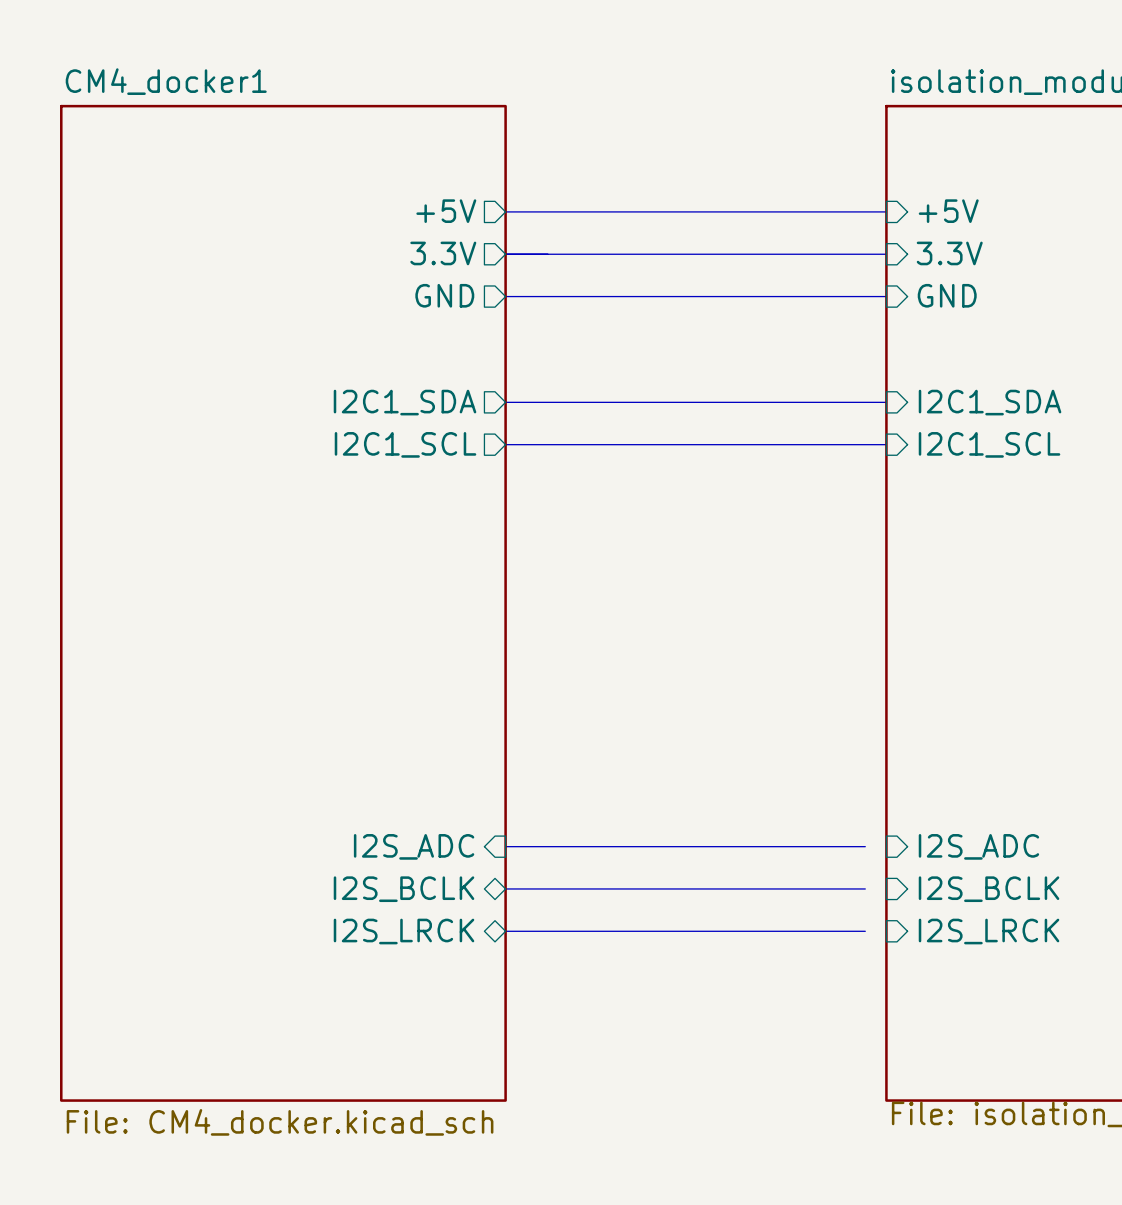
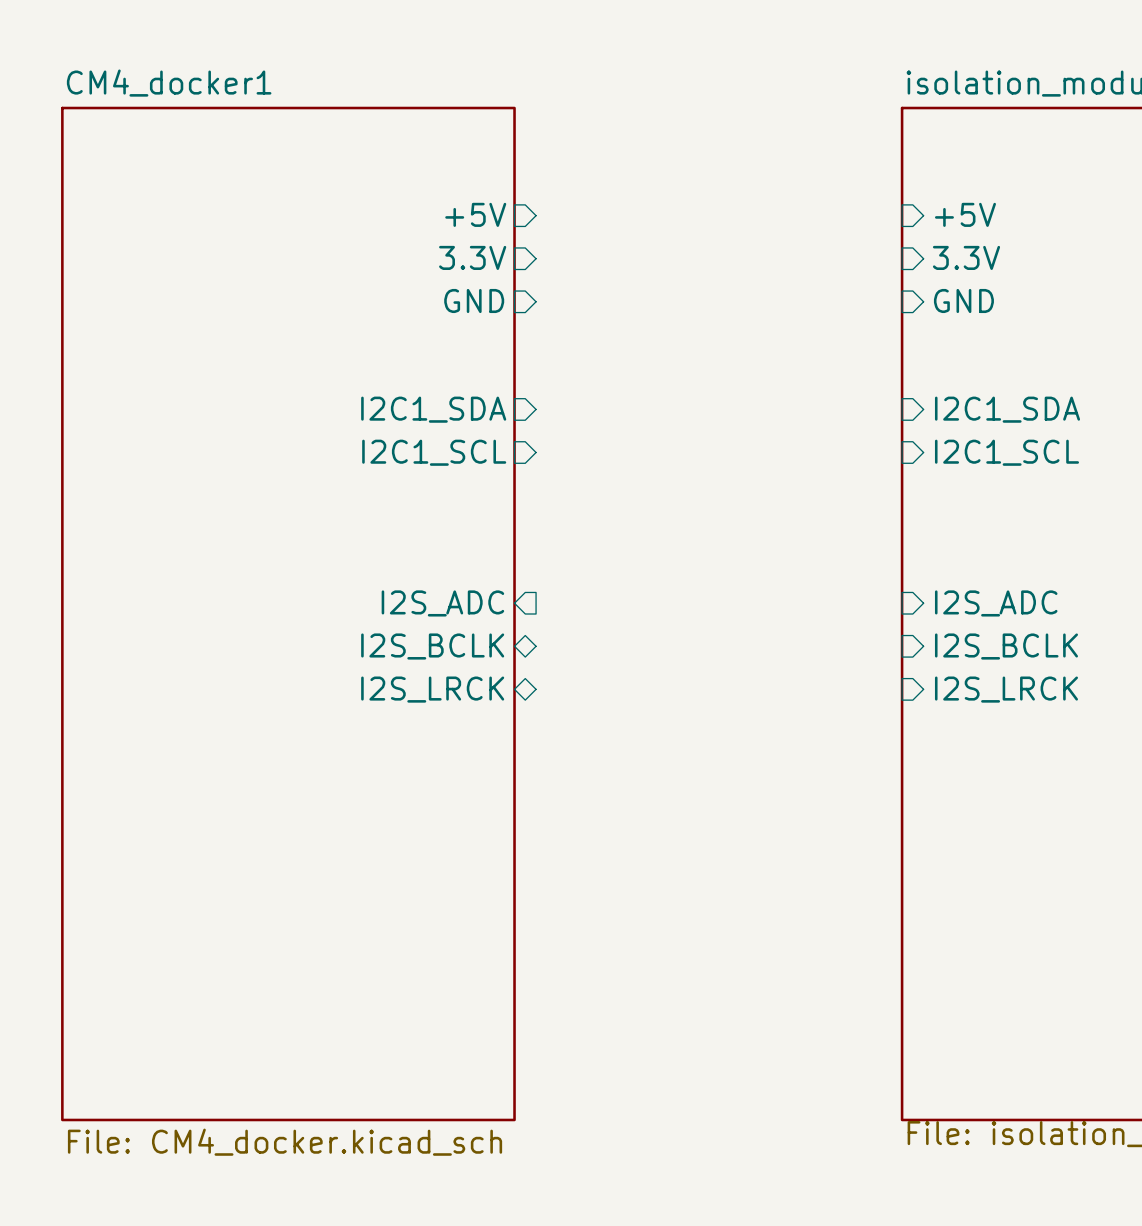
sheet pin position: +5V (446, 211) -> +5V (475, 214)
line: (505, 211) (886, 211) -> none
sheet pin position: 3.3V (443, 253) -> 3.3V (472, 257)
line: (505, 254) (886, 254) -> none
sheet pin position: GND (444, 295) -> GND (474, 300)
line: (505, 296) (886, 296) -> none
sheet pin position: I2C1_SDA (405, 402) -> I2C1_SDA (433, 409)
line: (505, 402) (886, 402) -> none
sheet pin position: I2C1_SCL (405, 444) -> I2C1_SCL (434, 452)
line: (505, 444) (886, 444) -> none
sheet pin: none -> I2S_ADC (442, 603)
sheet pin: none -> I2S_ADC (996, 603)
sheet pin: none -> I2S_BCLK (432, 646)
sheet pin: none -> I2S_BCLK (1006, 646)
sheet pin: none -> I2S_LRCK (432, 689)
sheet pin: none -> I2S_LRCK (1006, 689)
sheet pin: I2S_ADC (414, 846) -> none
line: (505, 846) (865, 846) -> none
sheet pin: I2S_ADC (978, 846) -> none
line: (505, 888) (865, 888) -> none
sheet pin: I2S_BCLK (404, 889) -> none
sheet pin: I2S_BCLK (989, 889) -> none
sheet pin: I2S_LRCK (404, 931) -> none
line: (505, 931) (865, 931) -> none
sheet pin: I2S_LRCK (989, 931) -> none

